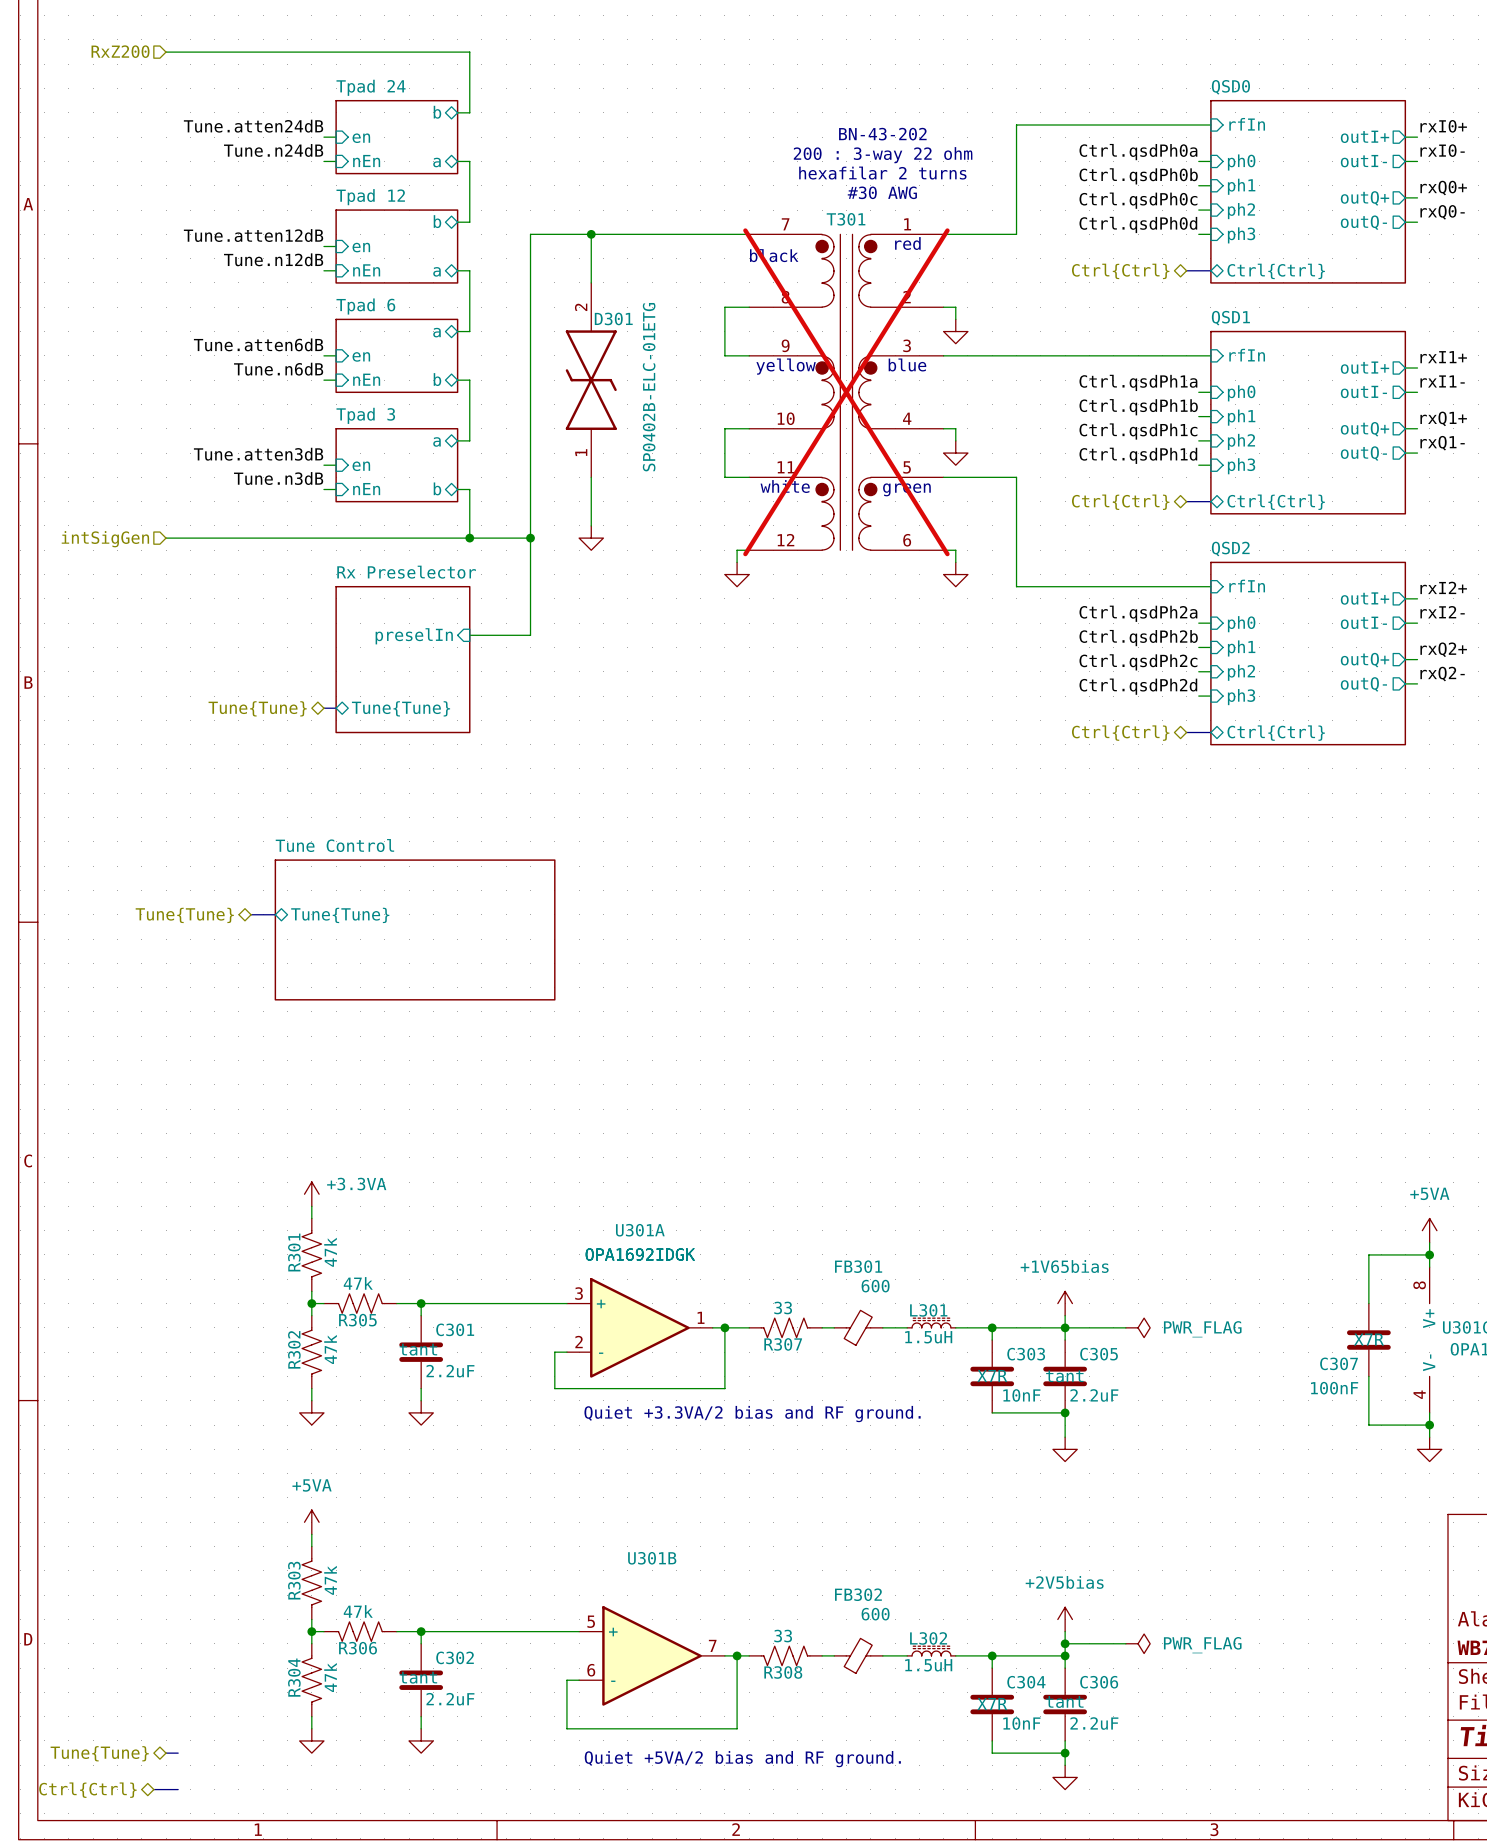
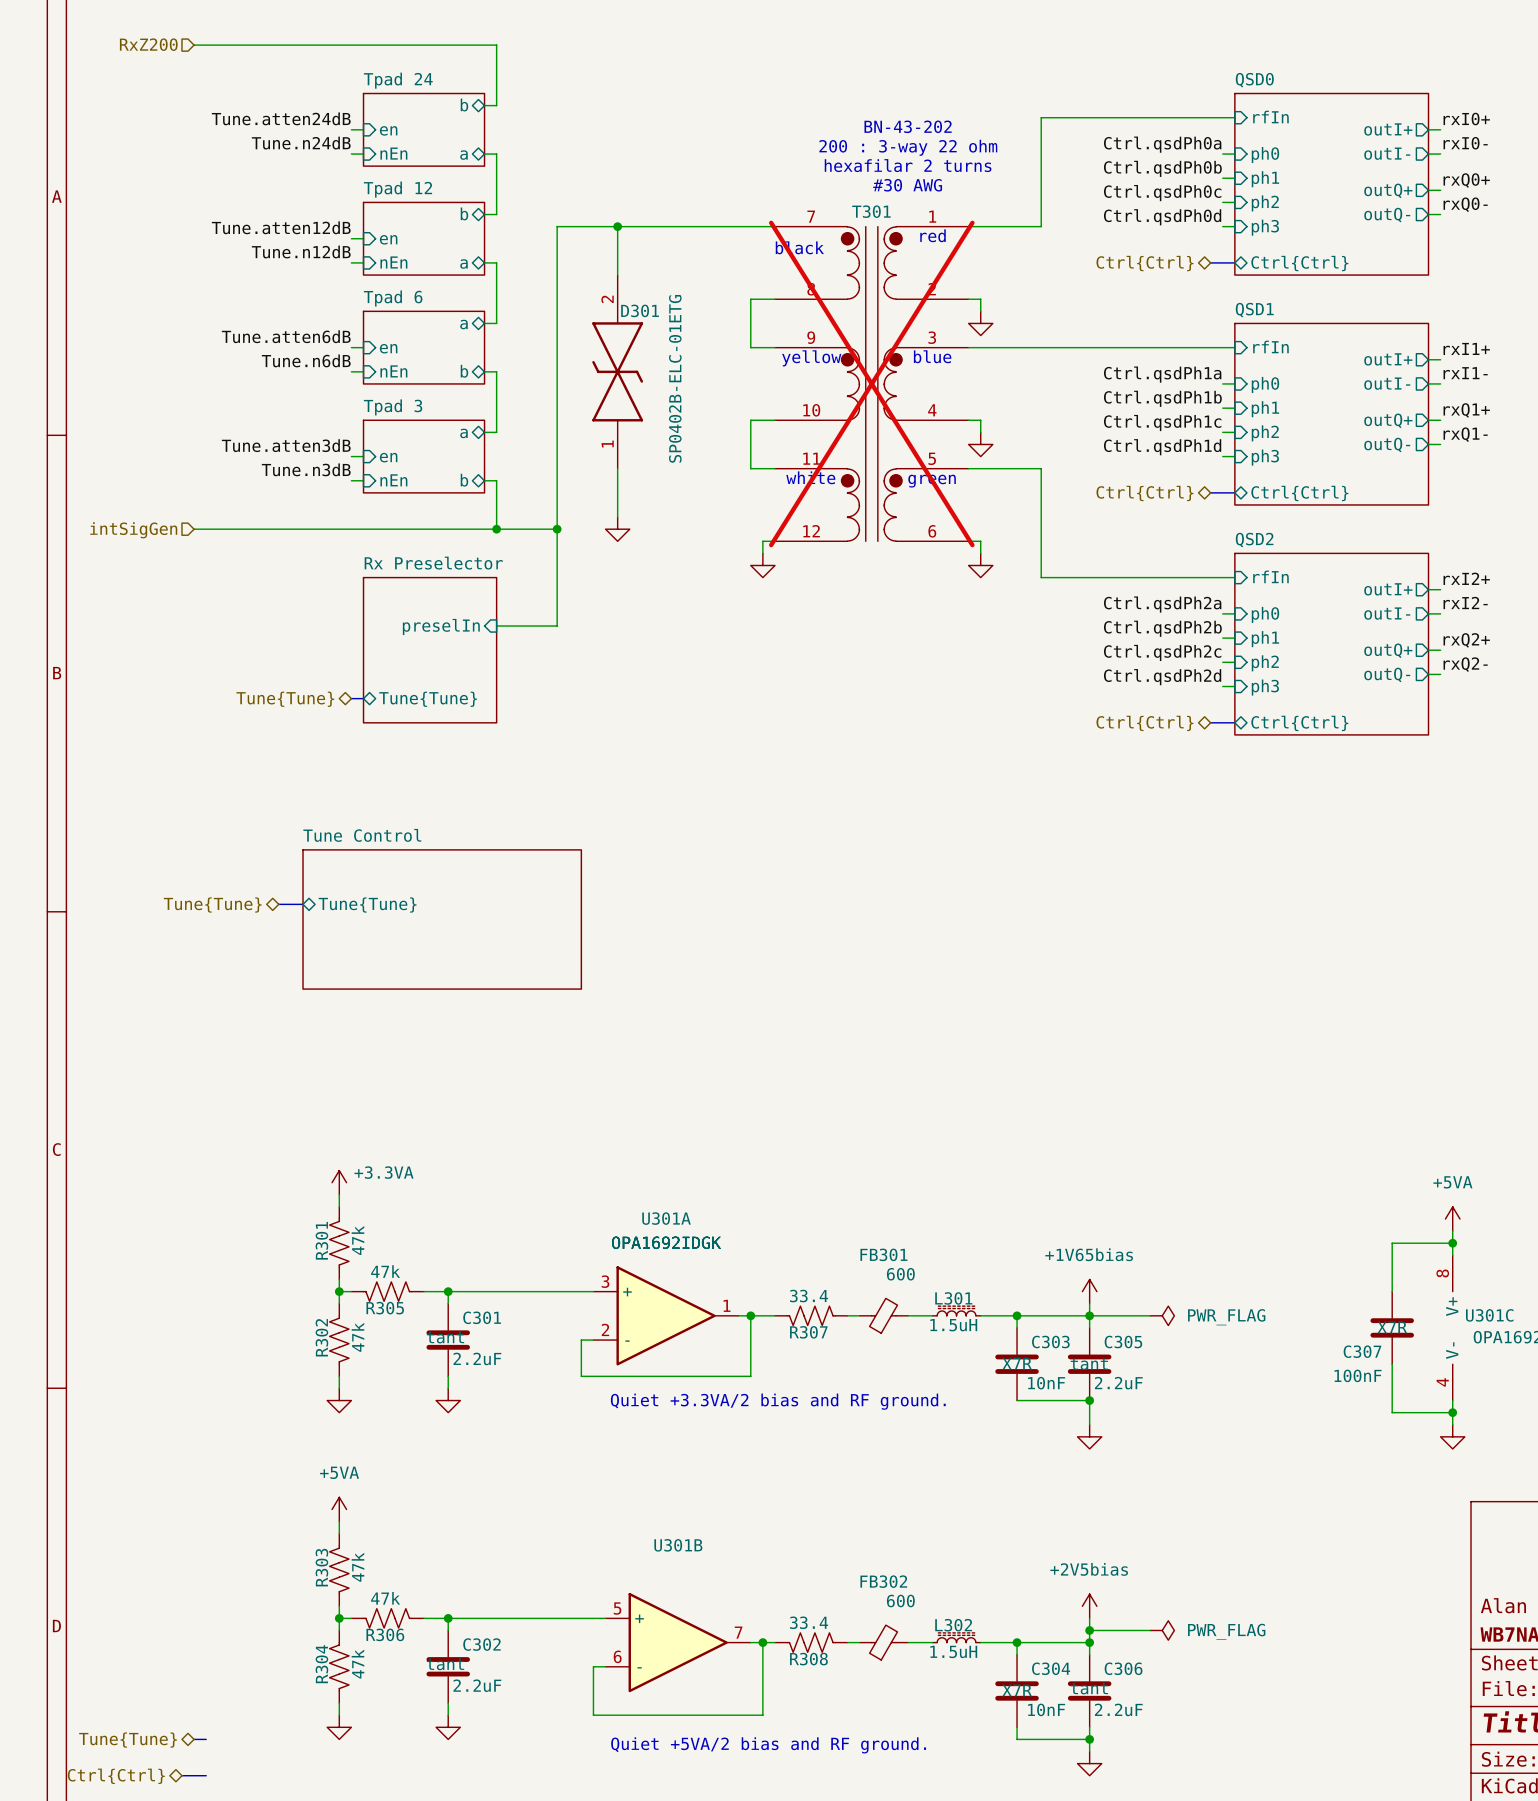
R307 value: 33 (783, 1307) -> 33.4 (809, 1296)
R308 value: 33 (783, 1636) -> 33.4 (809, 1622)

